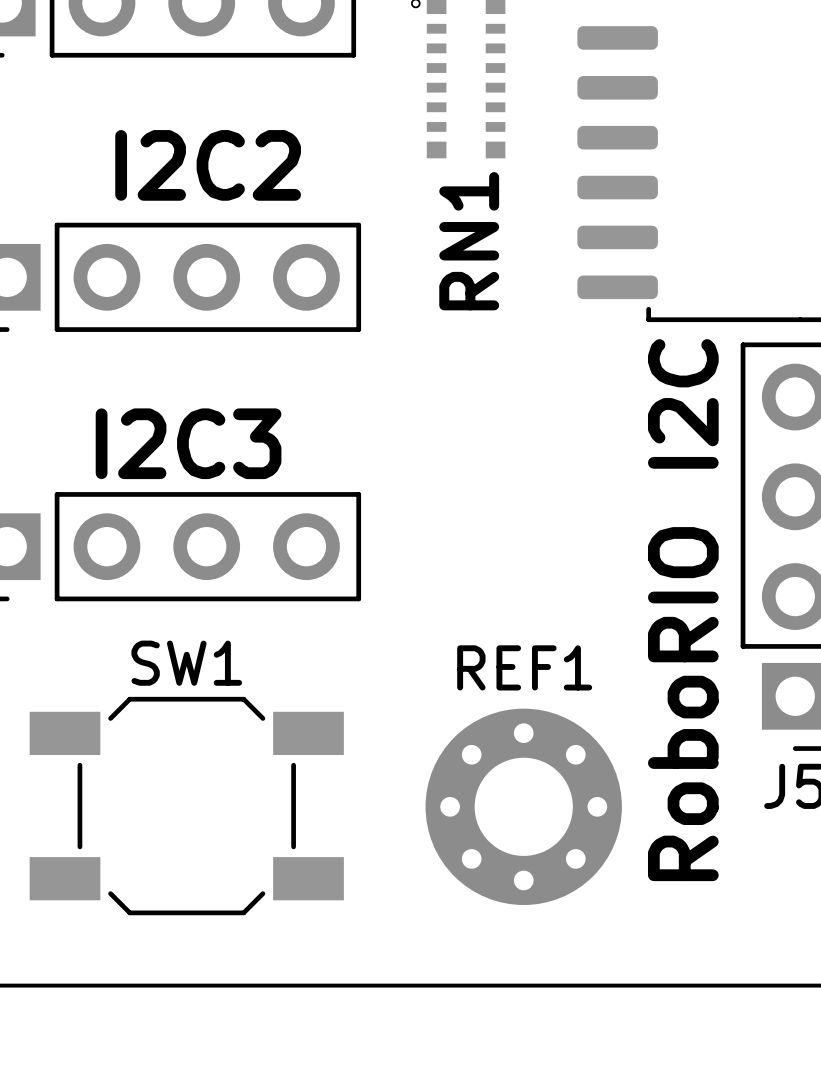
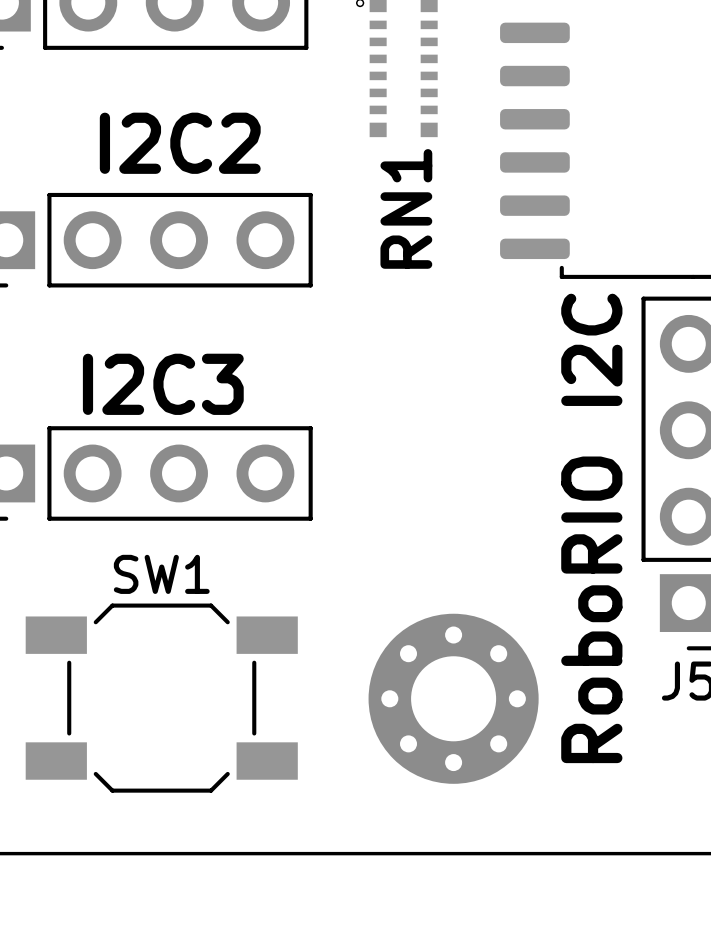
REF1 name: REF1 (524, 667) -> none

